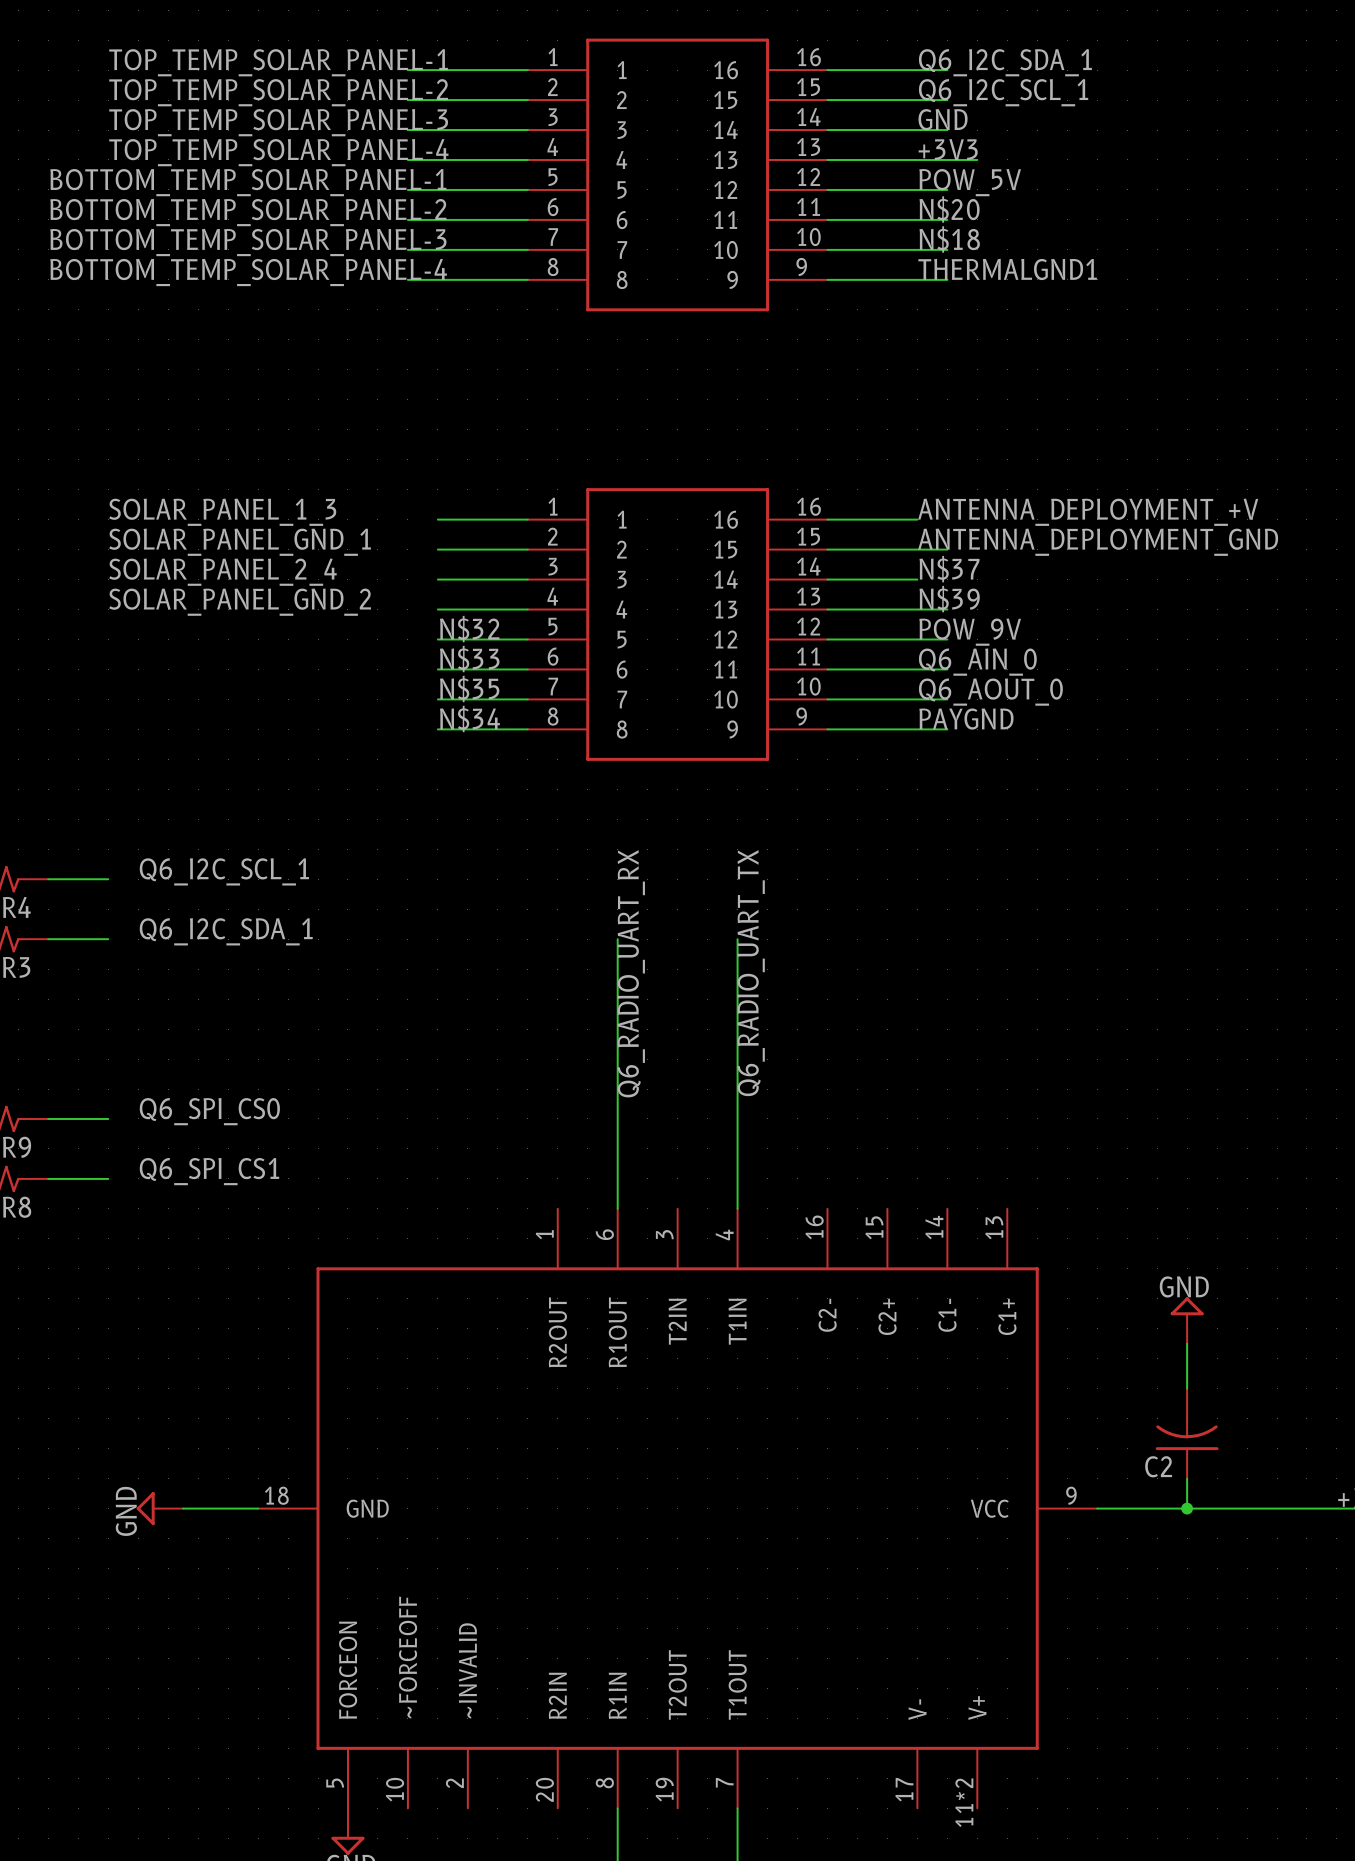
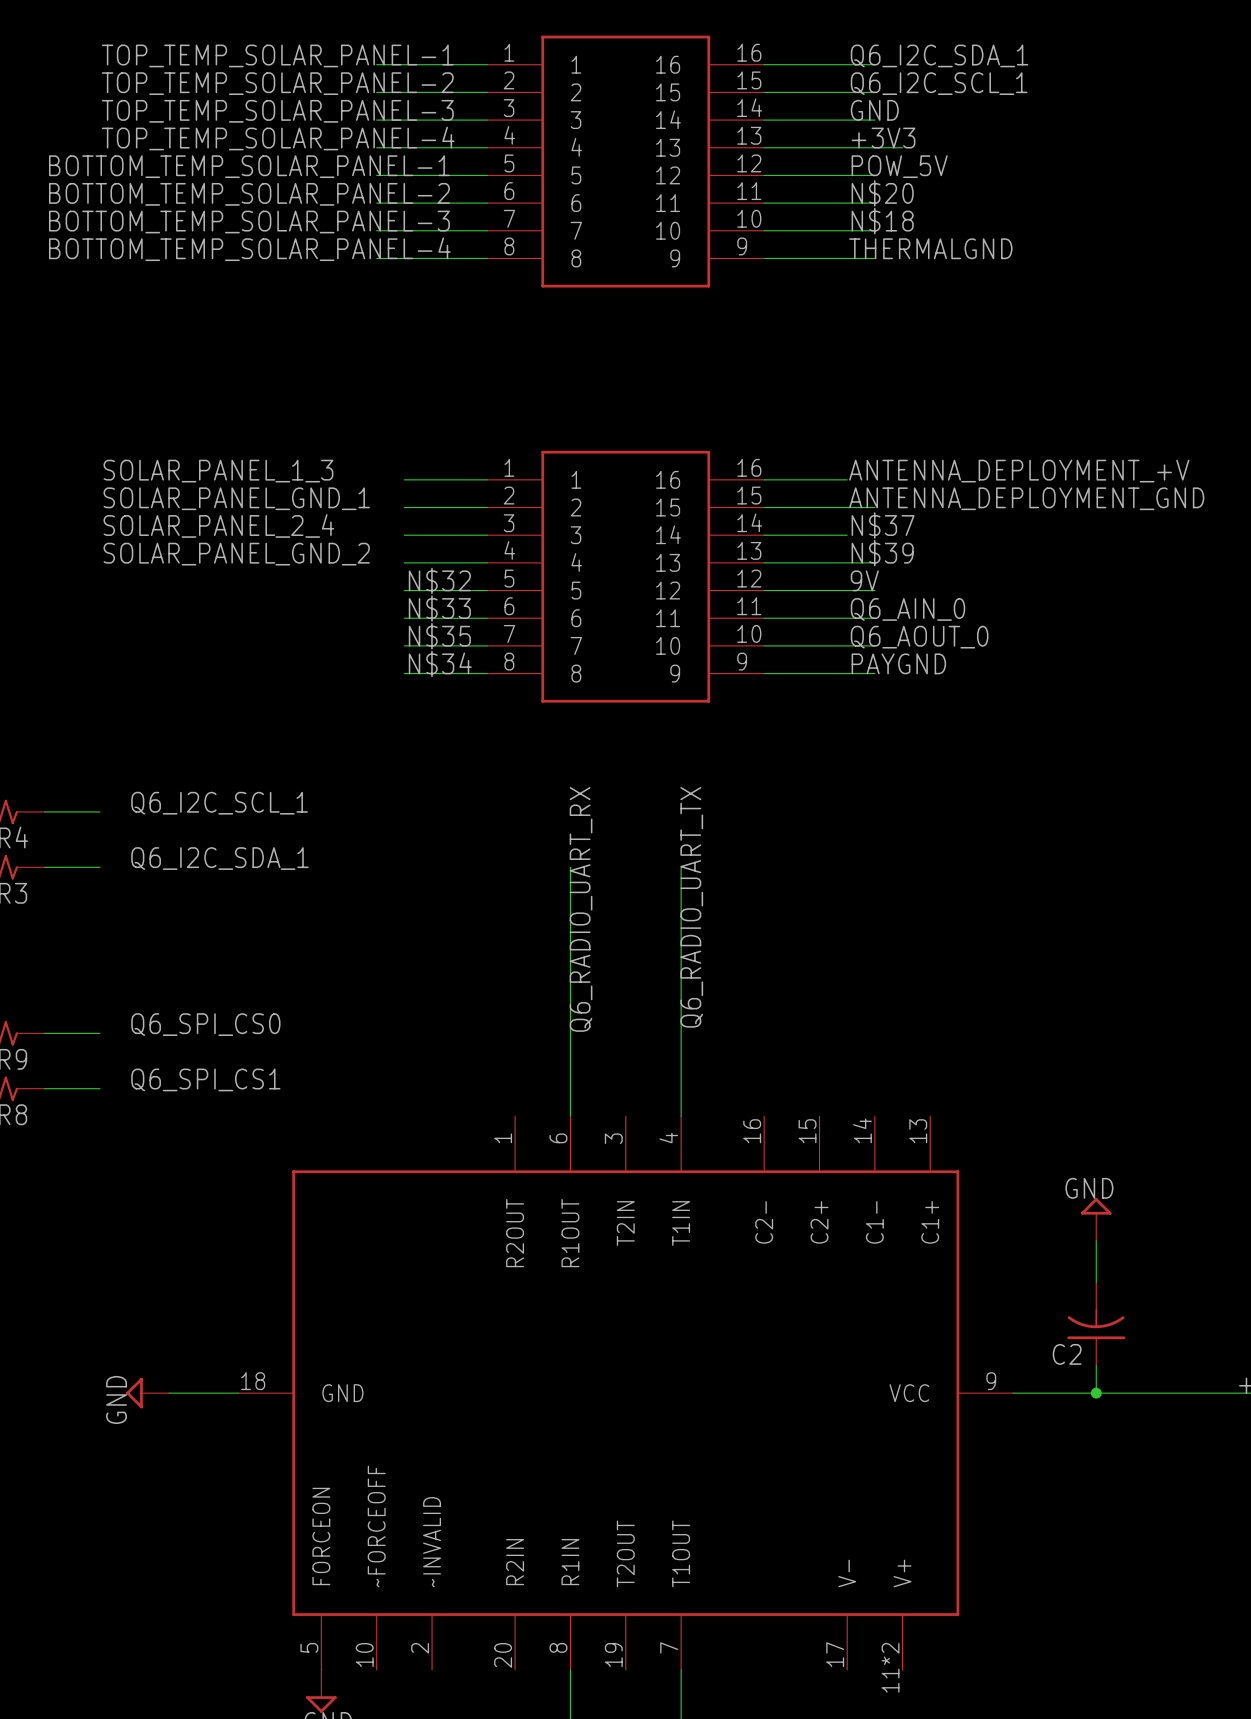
label: THERMALGND1 (1007, 269) -> THERMALGND (930, 248)
label: POW_9V (970, 632) -> 9V (864, 580)

